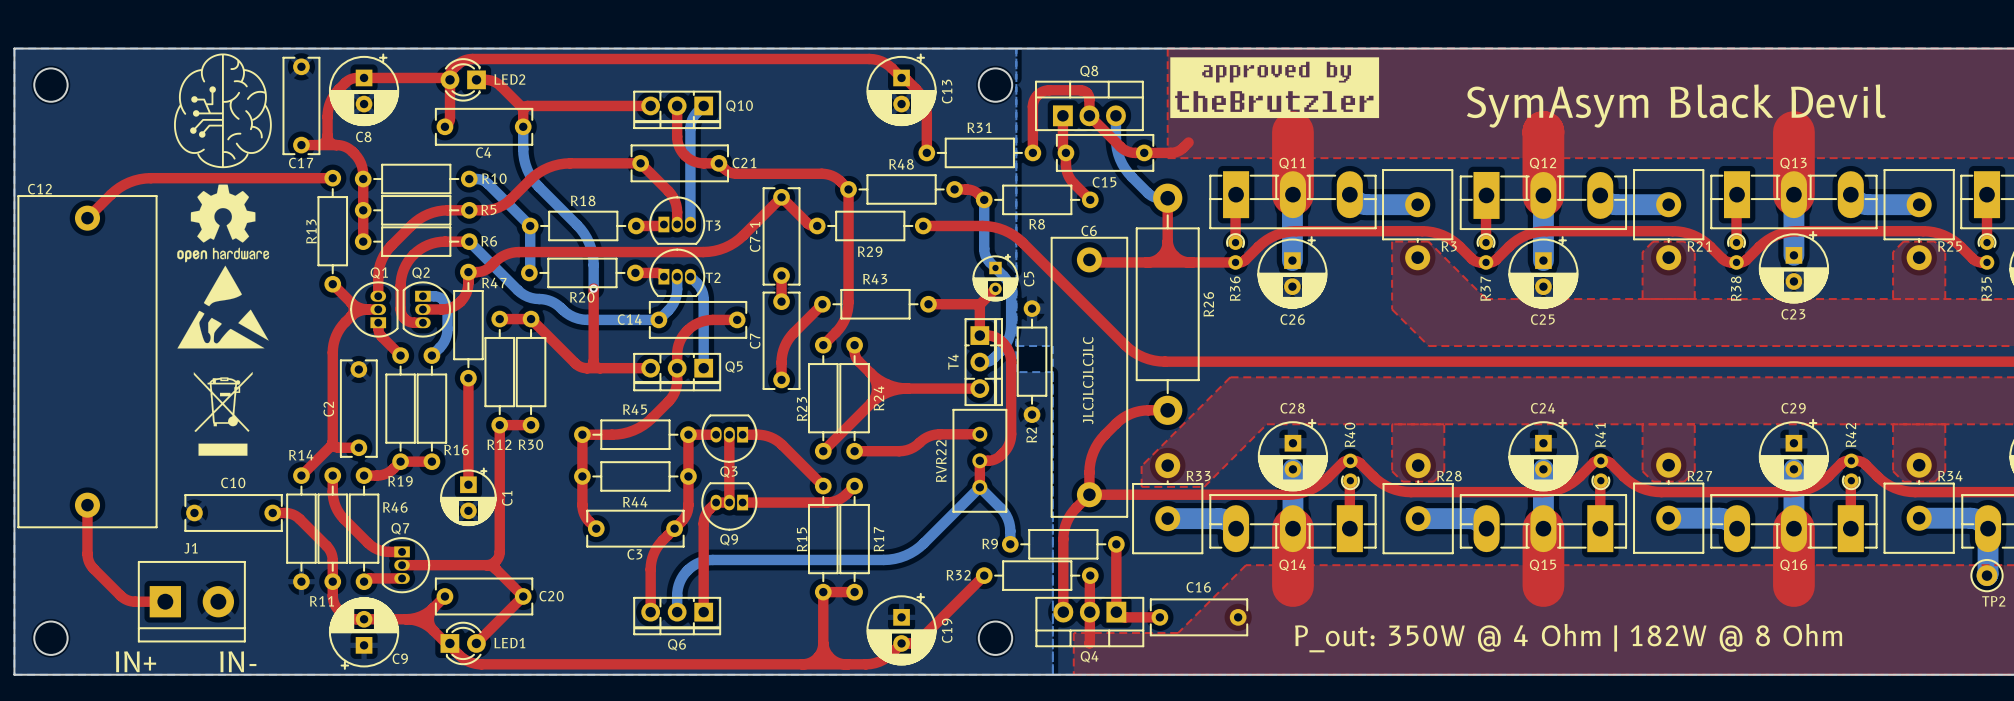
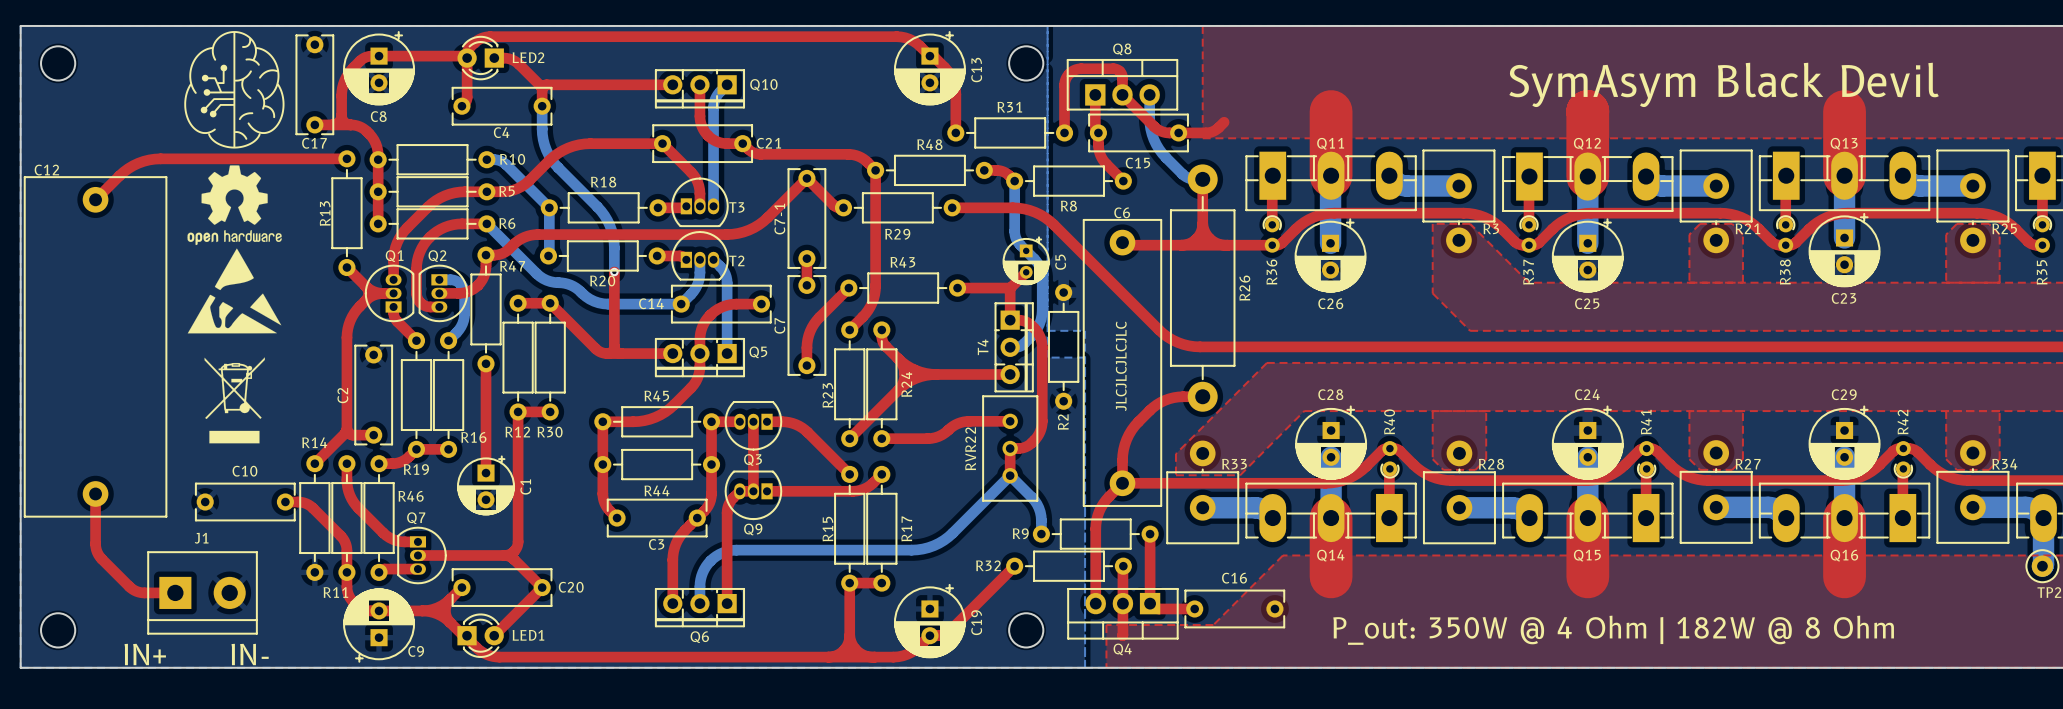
part: (1274, 87) -> none

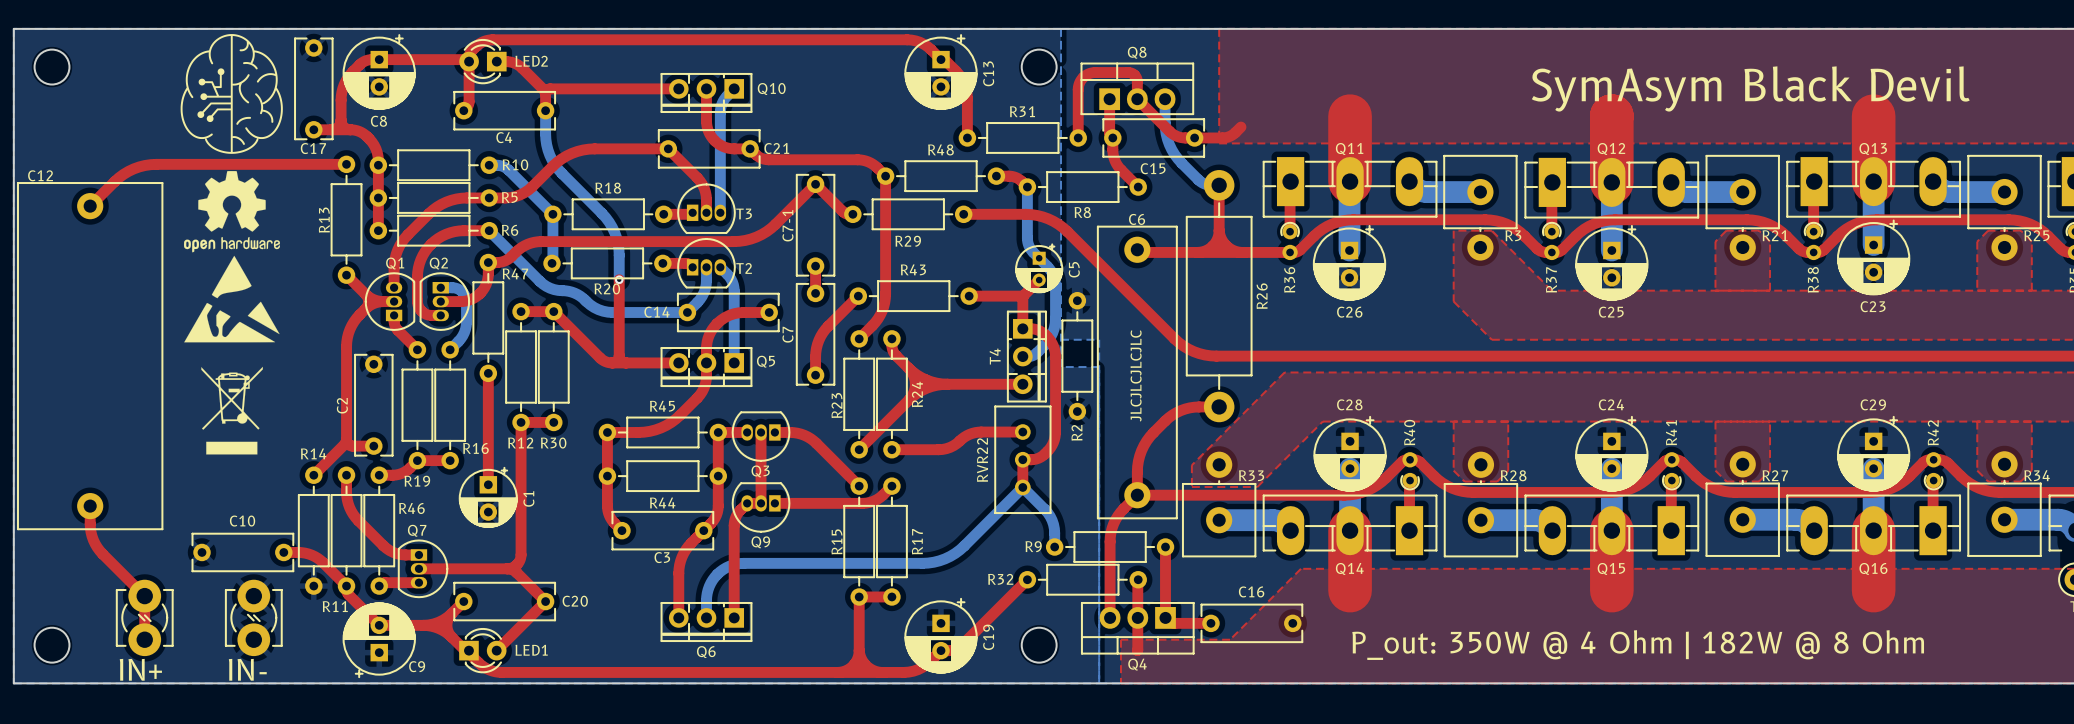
C10 position: (245, 502) -> (242, 552)
top track: (285, 502) (300, 502) (308, 504) (342, 537) (346, 548) (346, 586) (349, 597) (362, 609) (379, 610) -> (283, 552) (305, 553) (320, 560) (344, 584) (348, 594) (379, 625)
top track: (95, 511) (95, 546) (101, 559) (136, 591) (175, 592) -> (90, 523) (93, 540) (99, 550) (144, 596) (144, 639)
J1: (202, 592) -> none
part: none -> (144, 617)
part: none -> (253, 617)

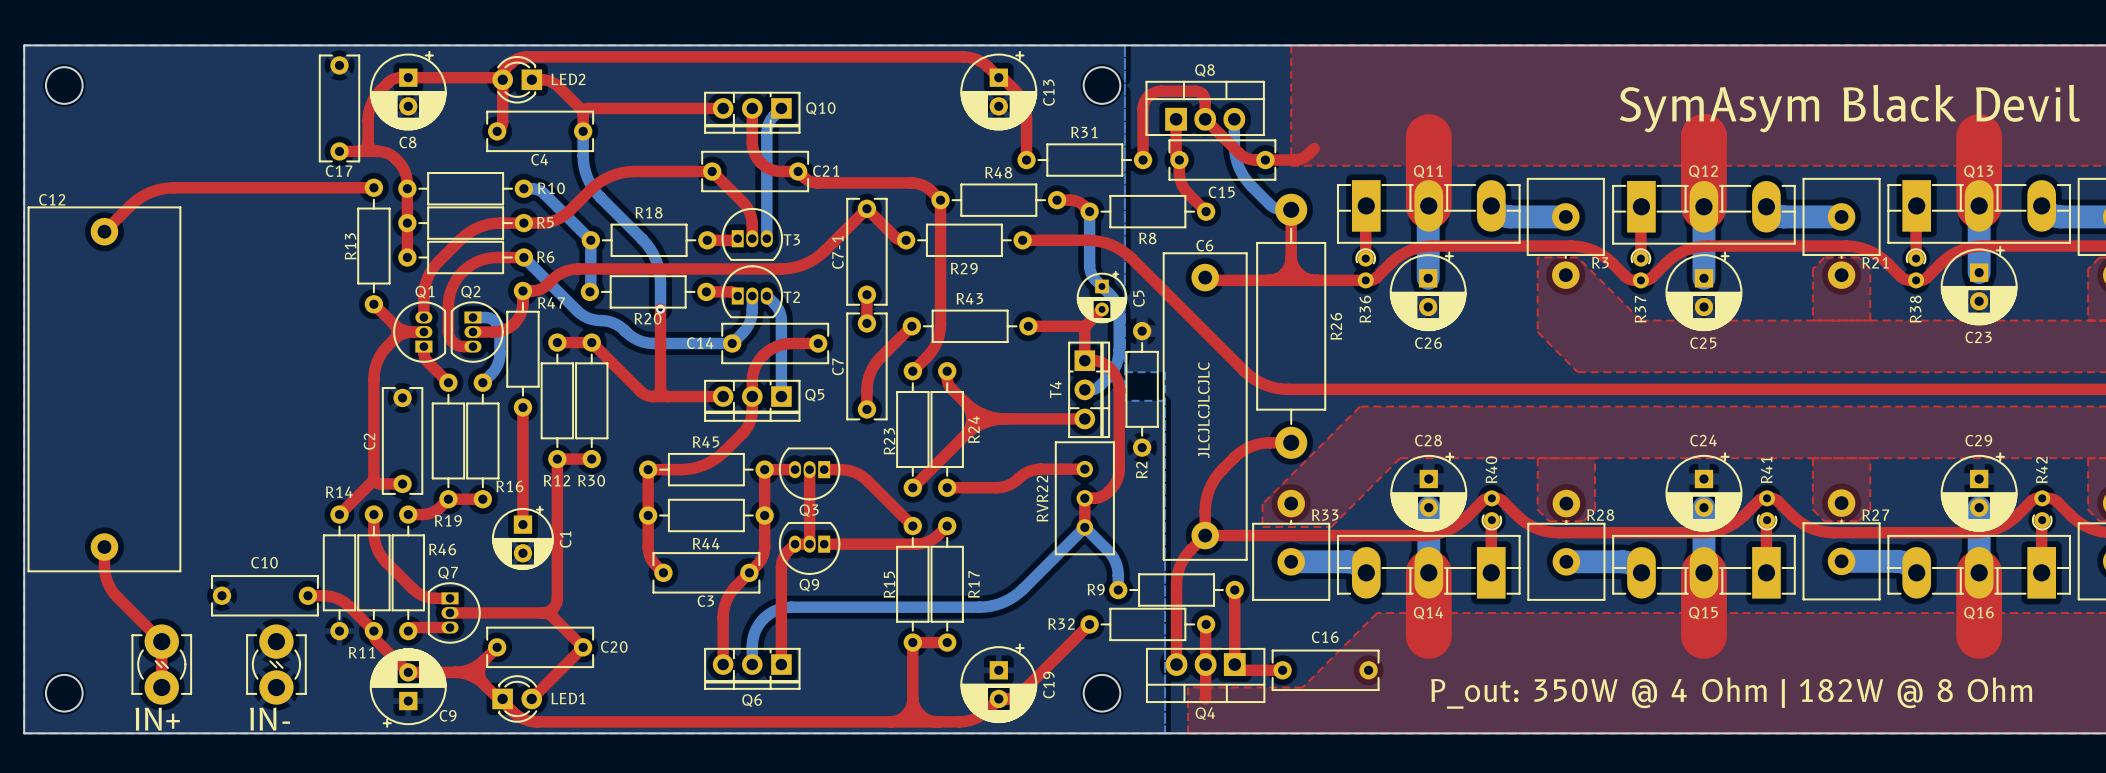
drawing: [180, 34, 283, 154] -> none
drawing: [183, 171, 281, 343] -> none
drawing: [201, 366, 263, 455] -> none

